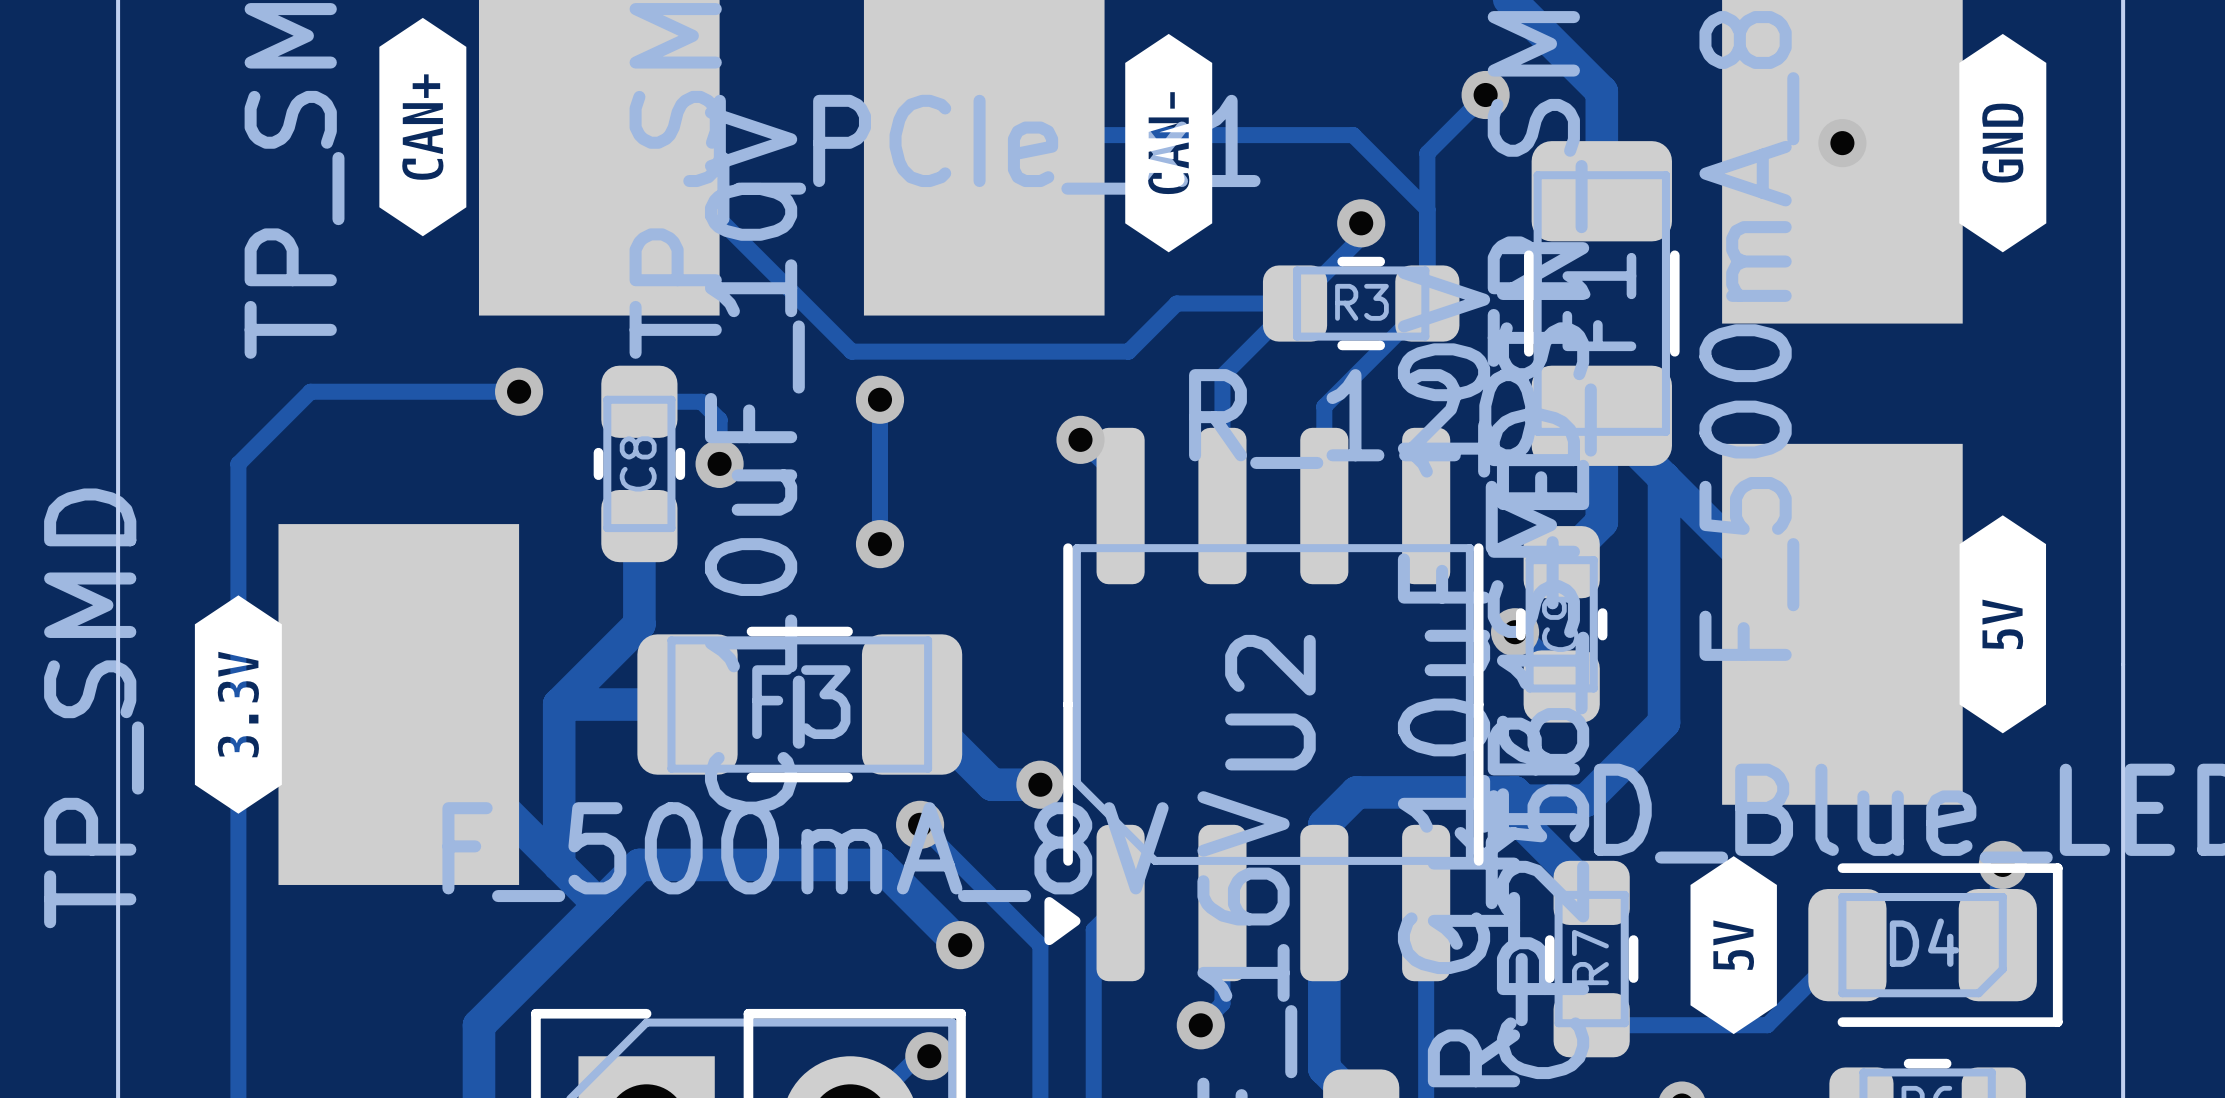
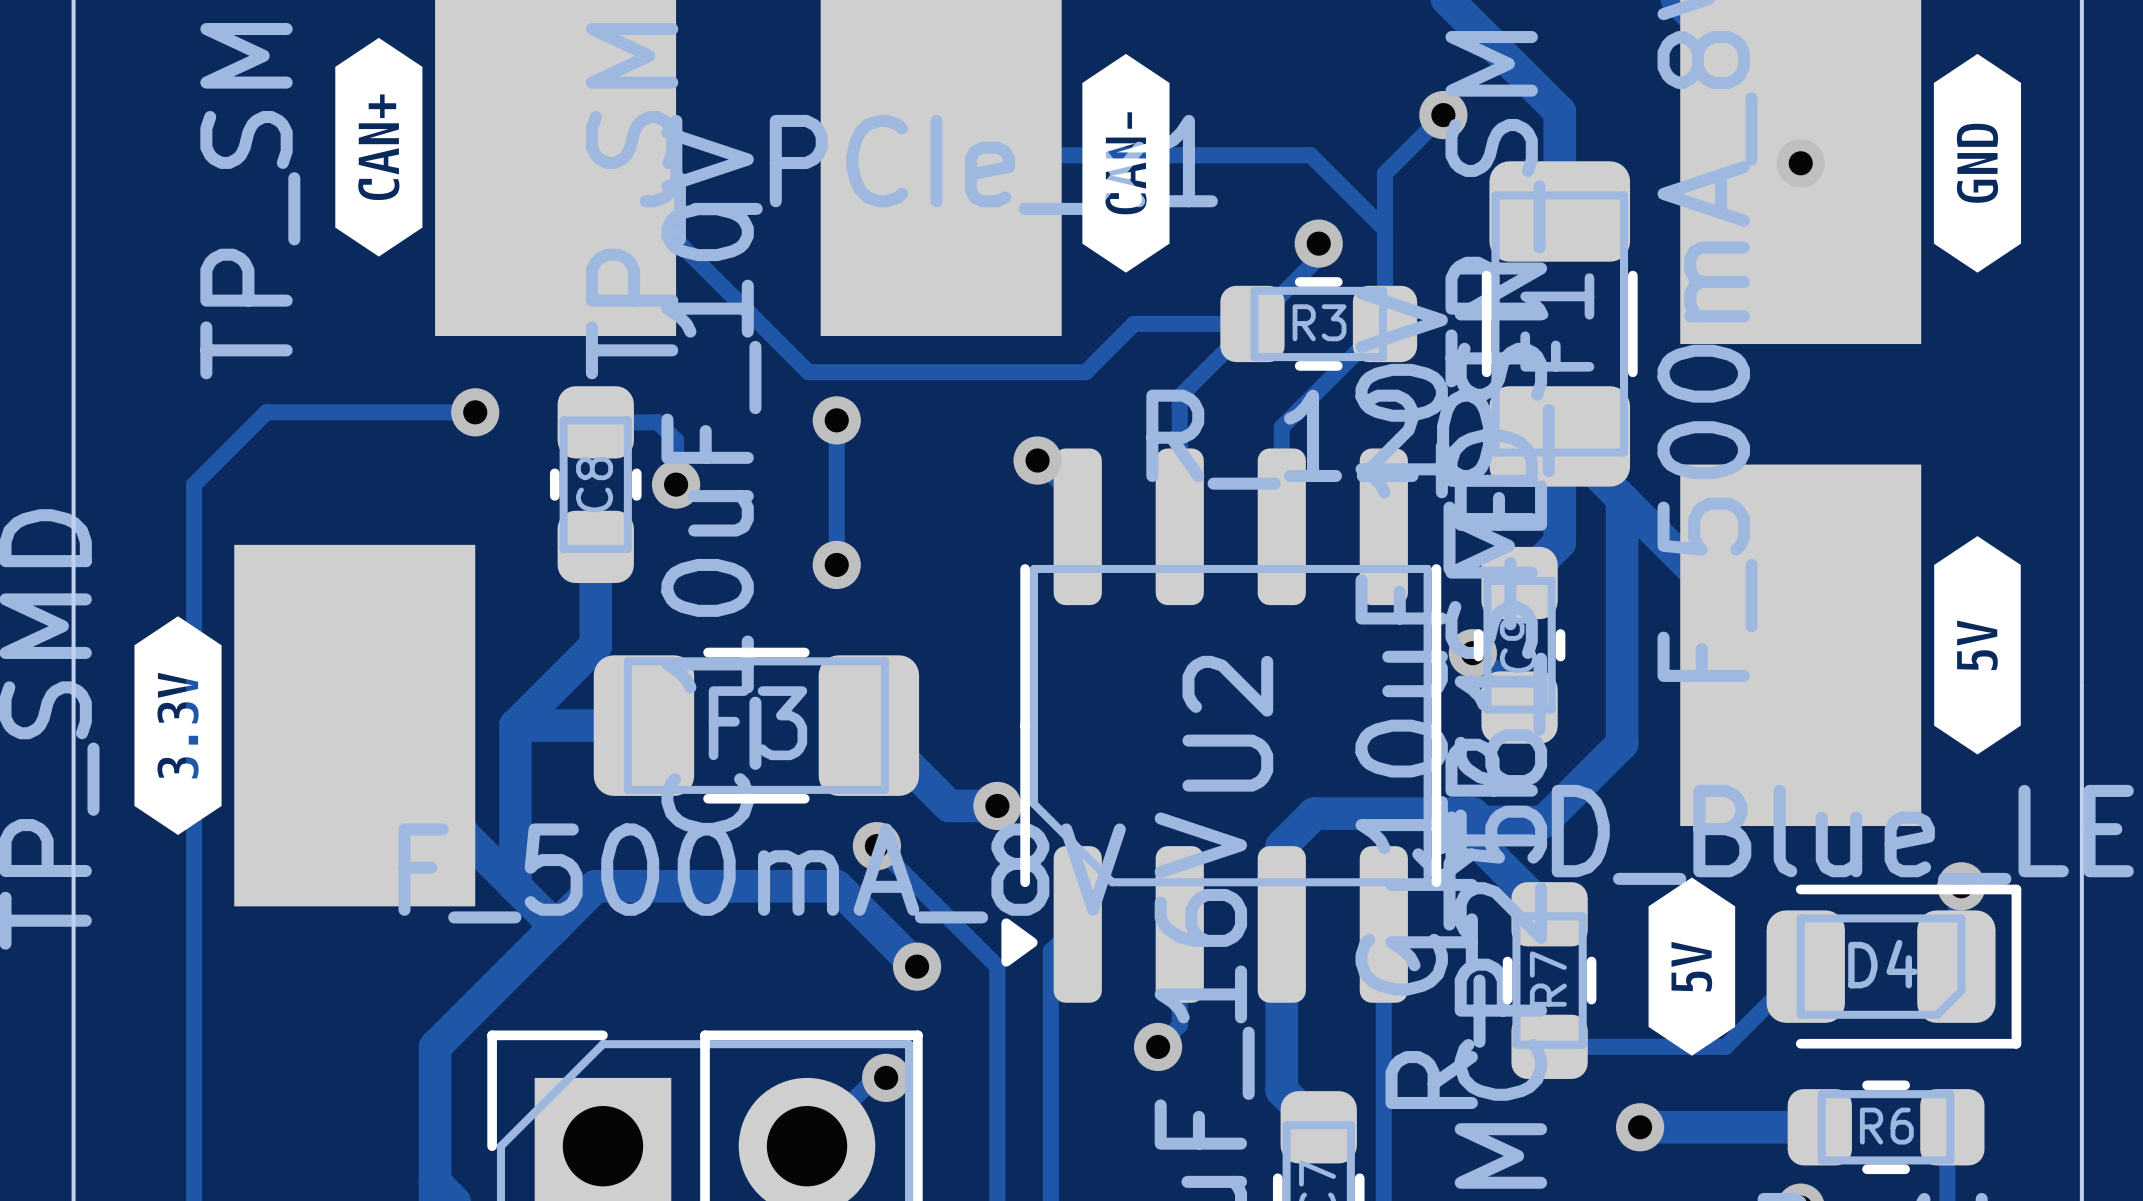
drawing position: (2002, 143) -> (1977, 163)
drawing position: (2002, 624) -> (1977, 645)
drawing position: (238, 704) -> (178, 725)

